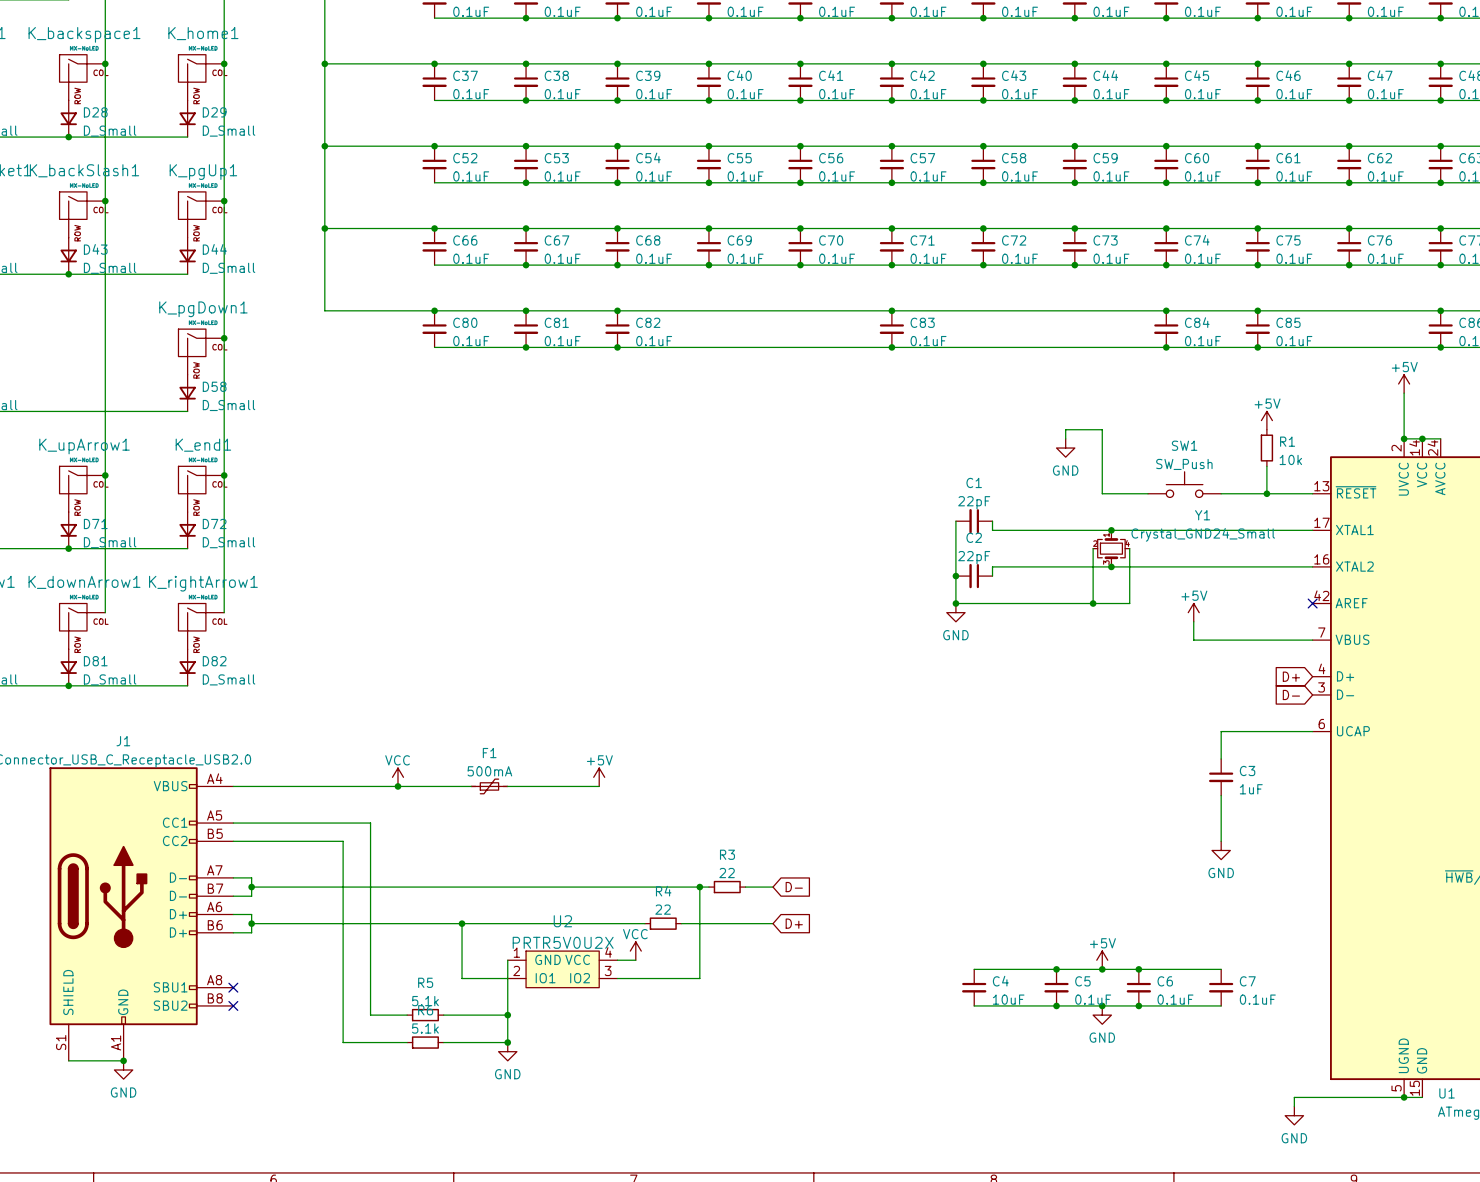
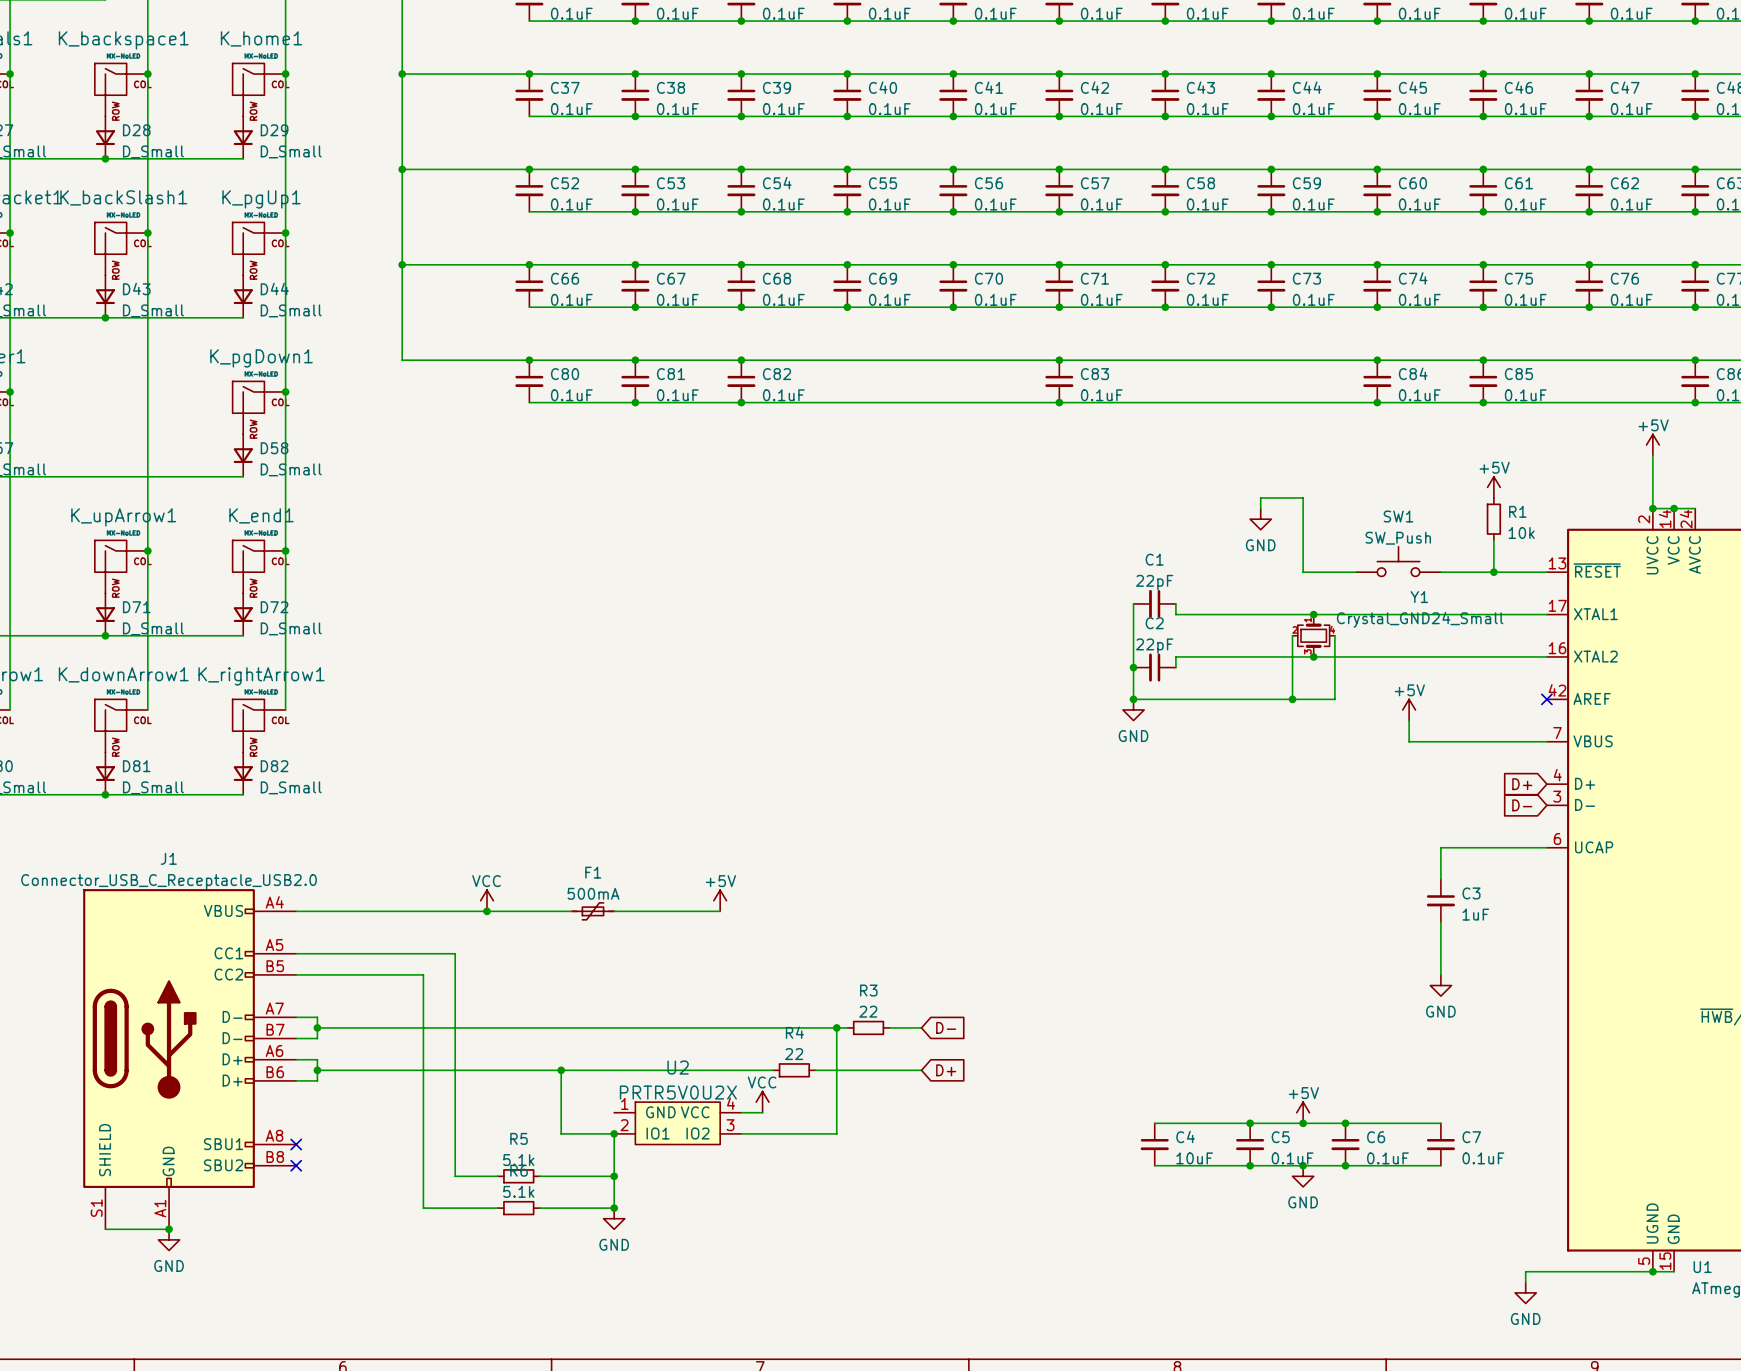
wire: (507, 960) (507, 978) -> none
junction: none -> (614, 1133)

